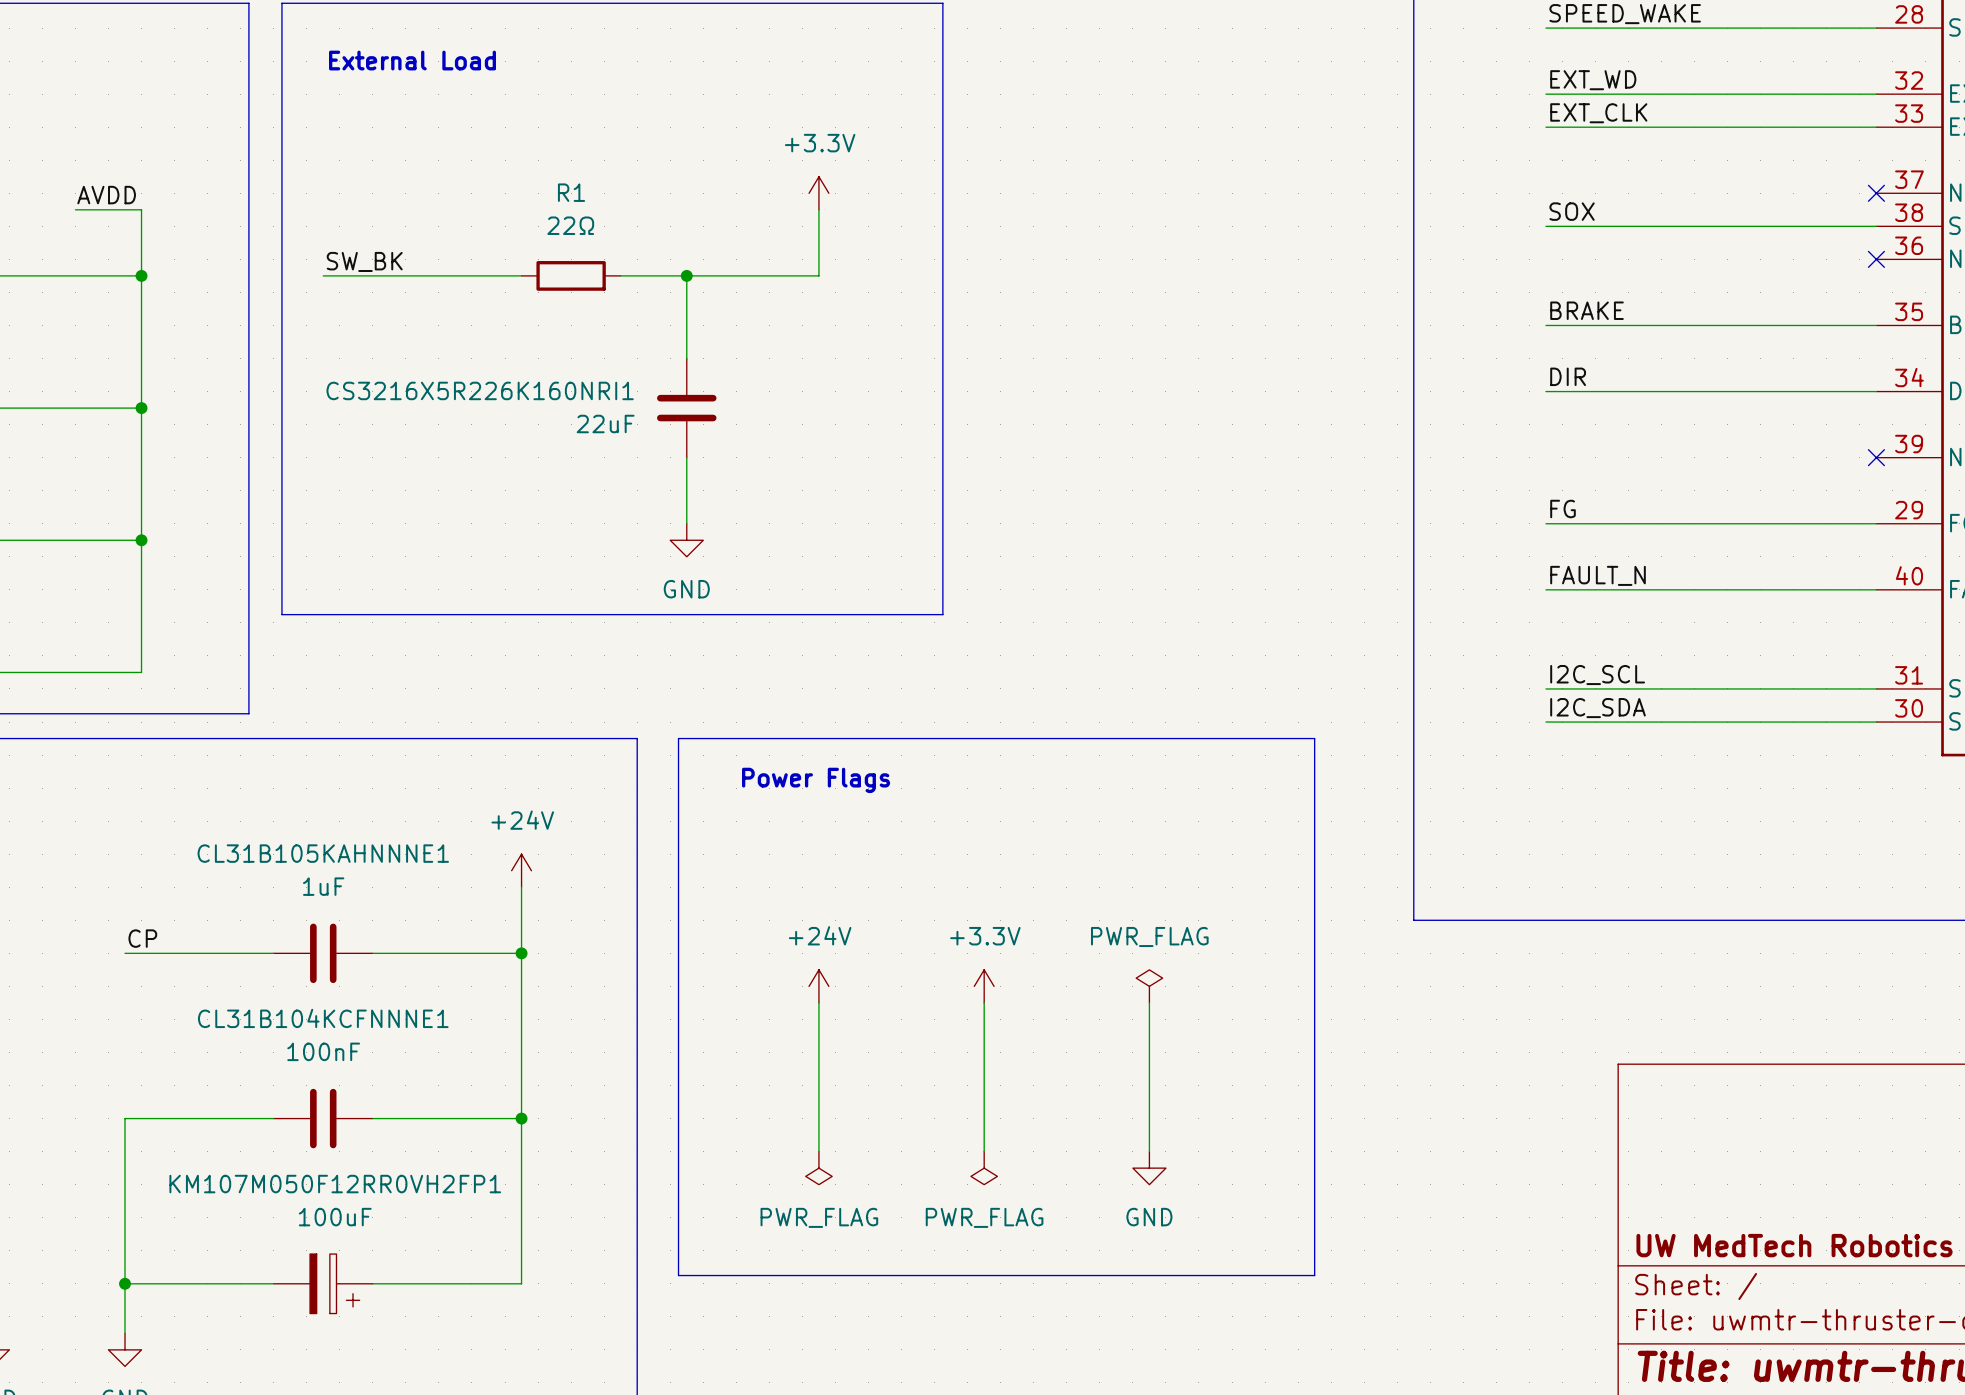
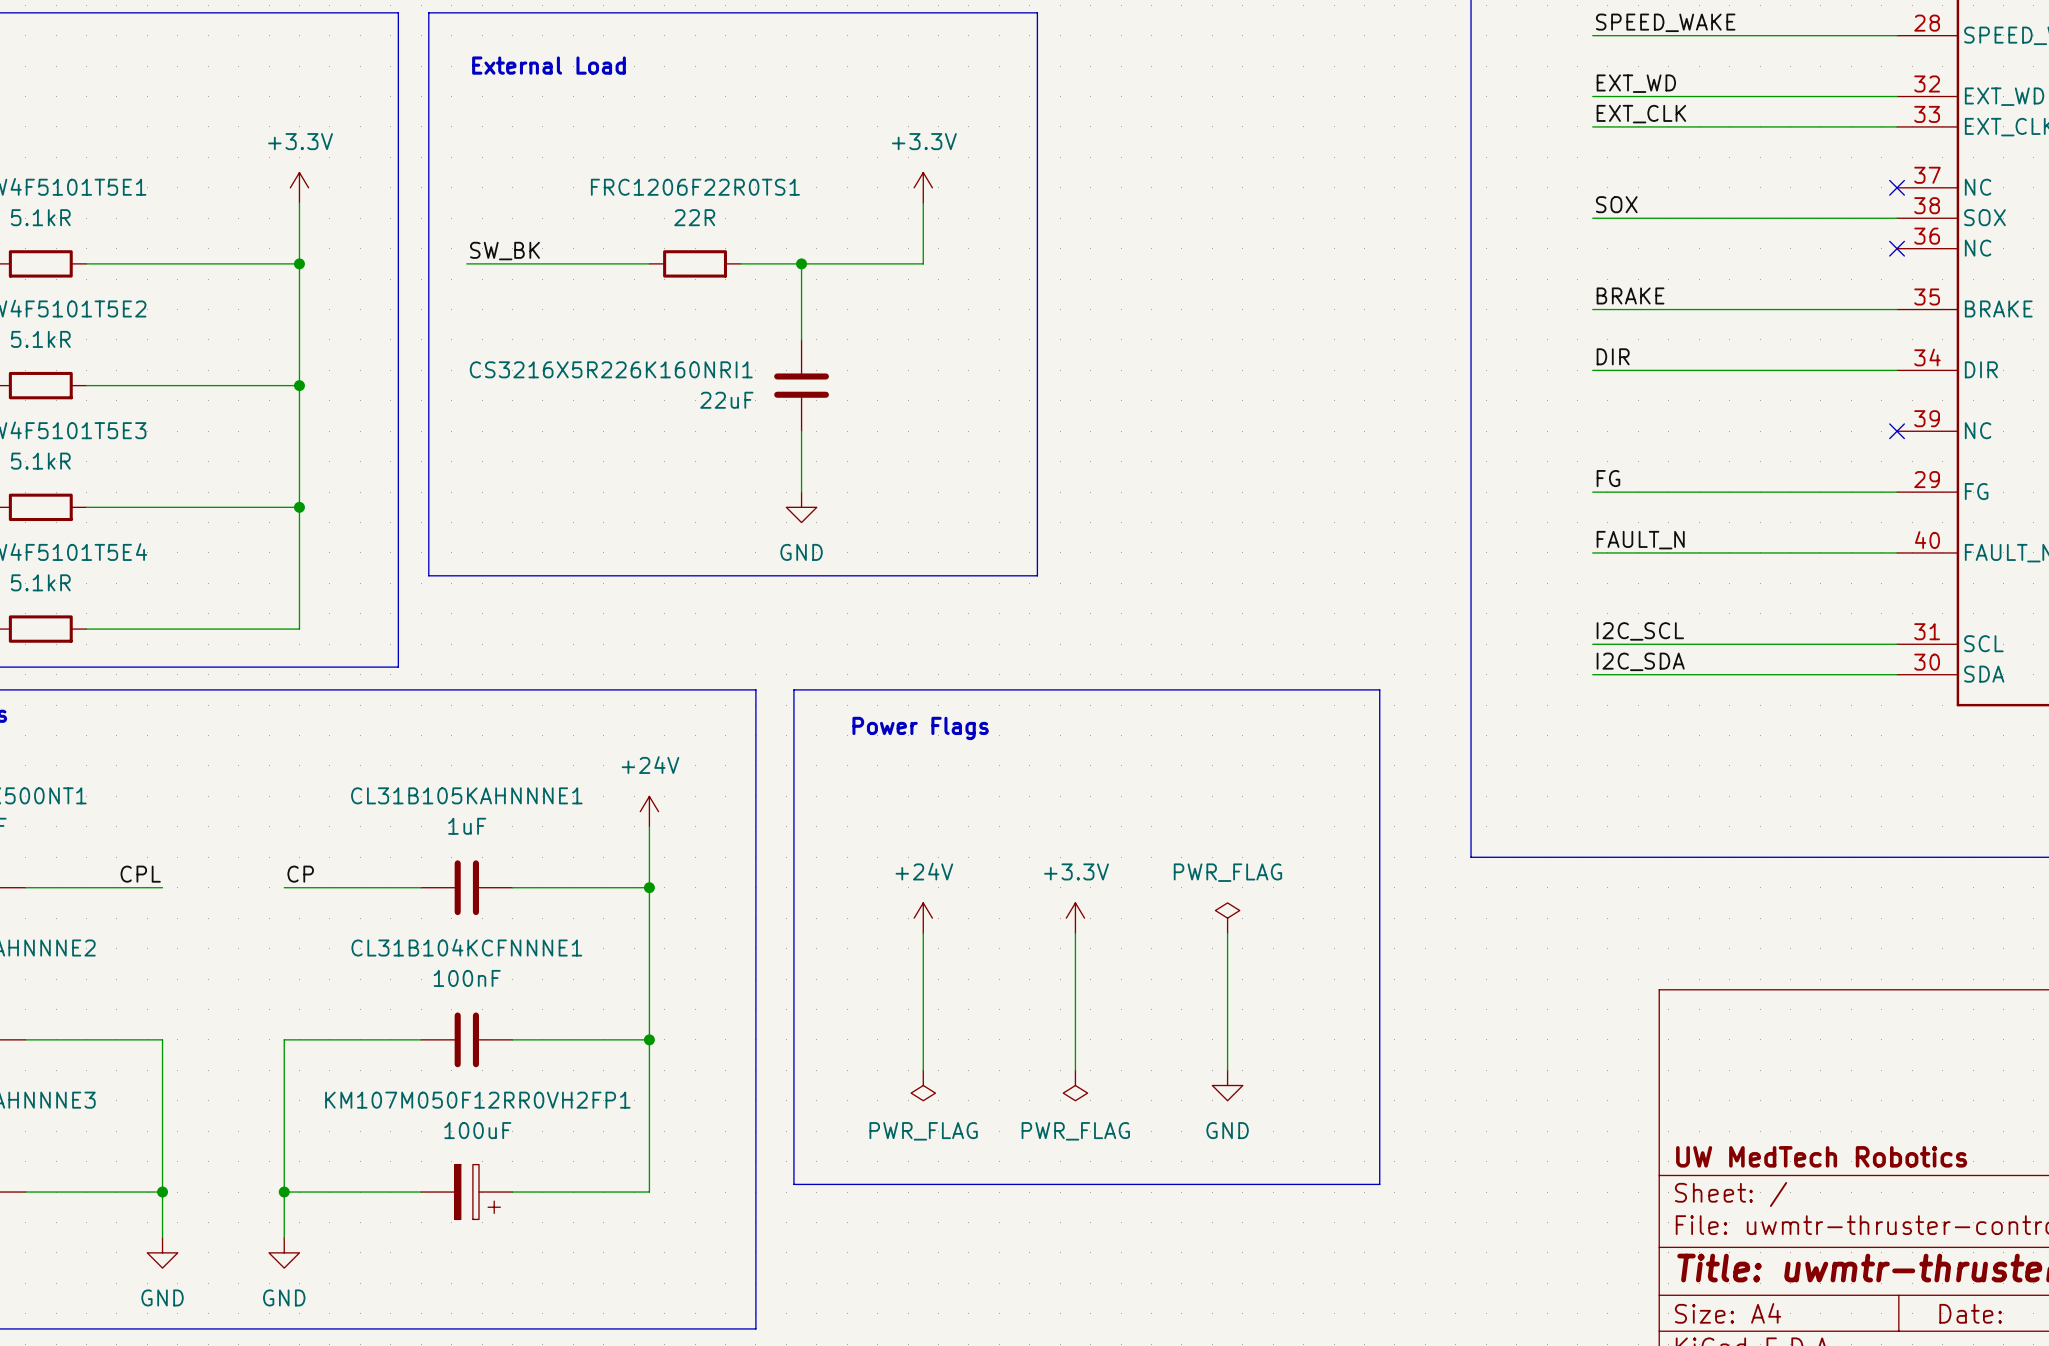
R1 name: R1 (571, 192) -> FRC1206F22R0TS1 (695, 187)
power symbol: none -> +3.3V (299, 187)
label: AVDD (106, 195) -> none
wire: (75, 209) (141, 209) -> none
R1 value: 22Ω (570, 225) -> 22R (694, 217)

